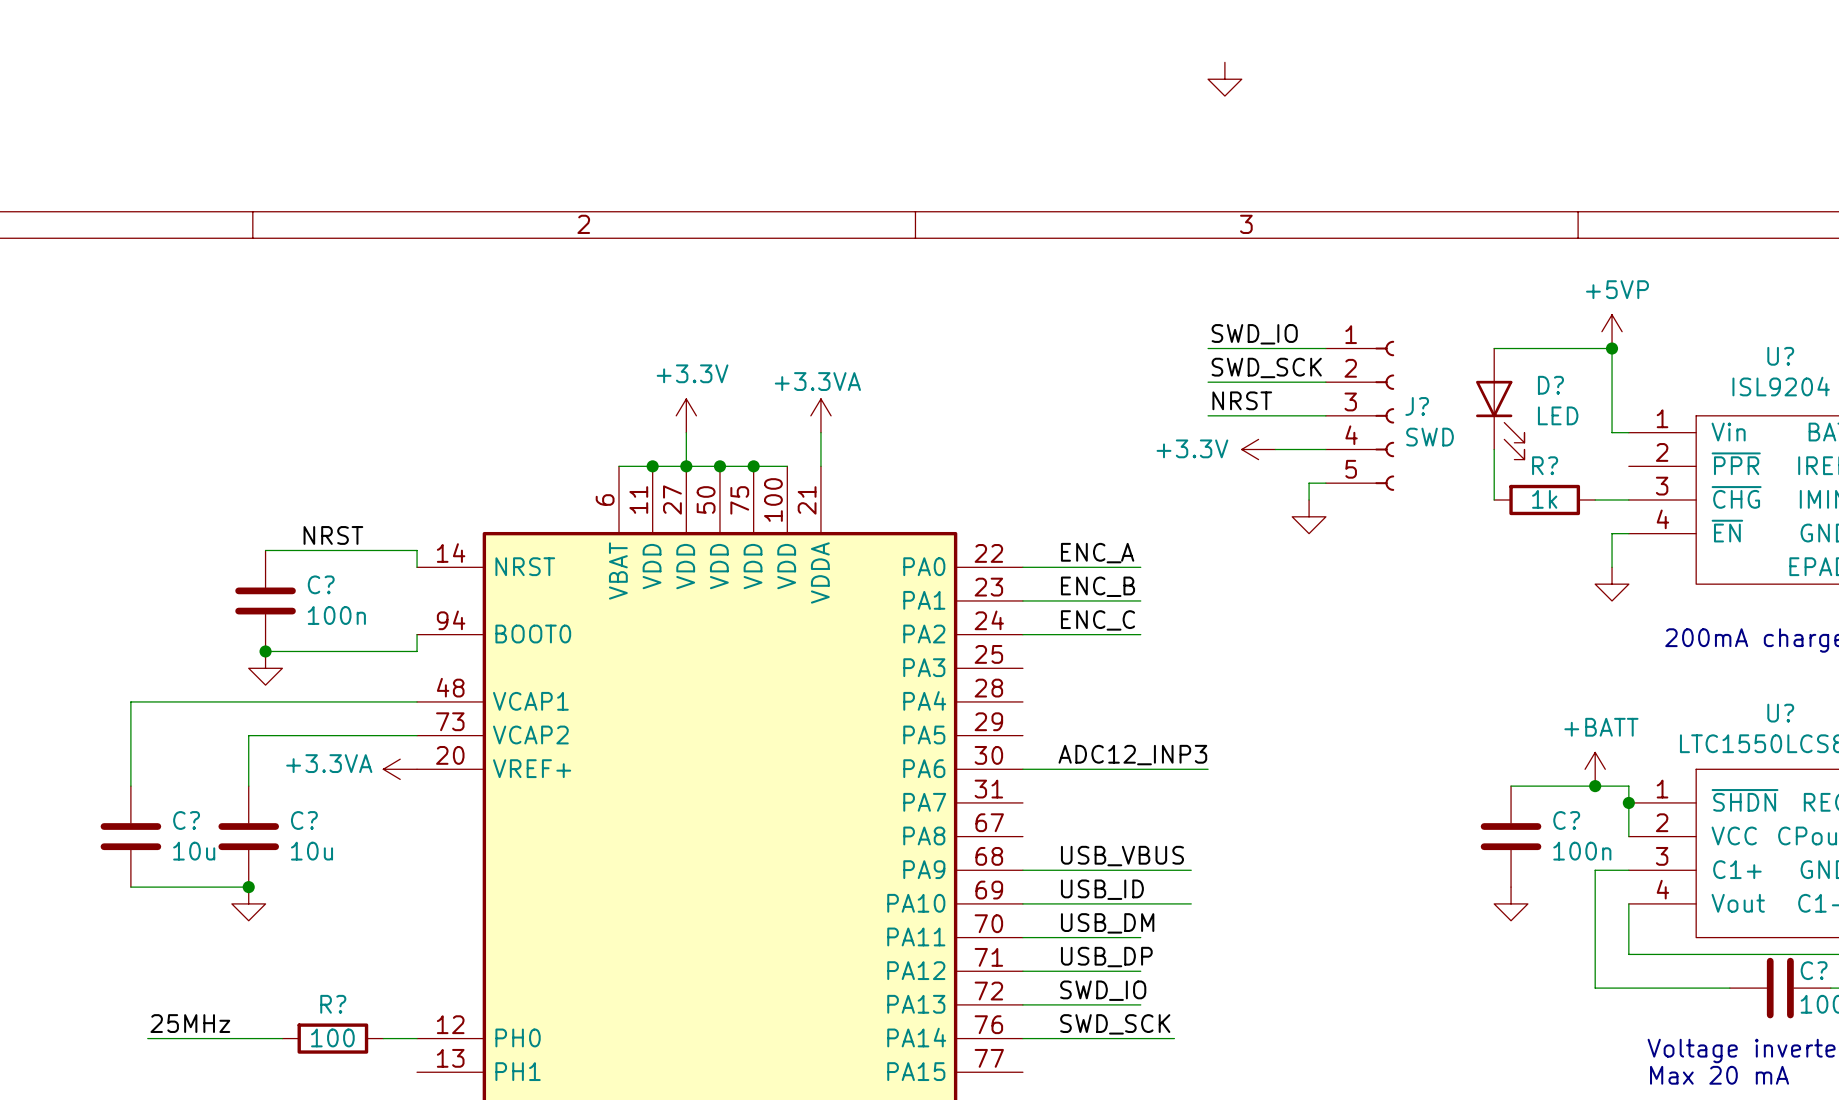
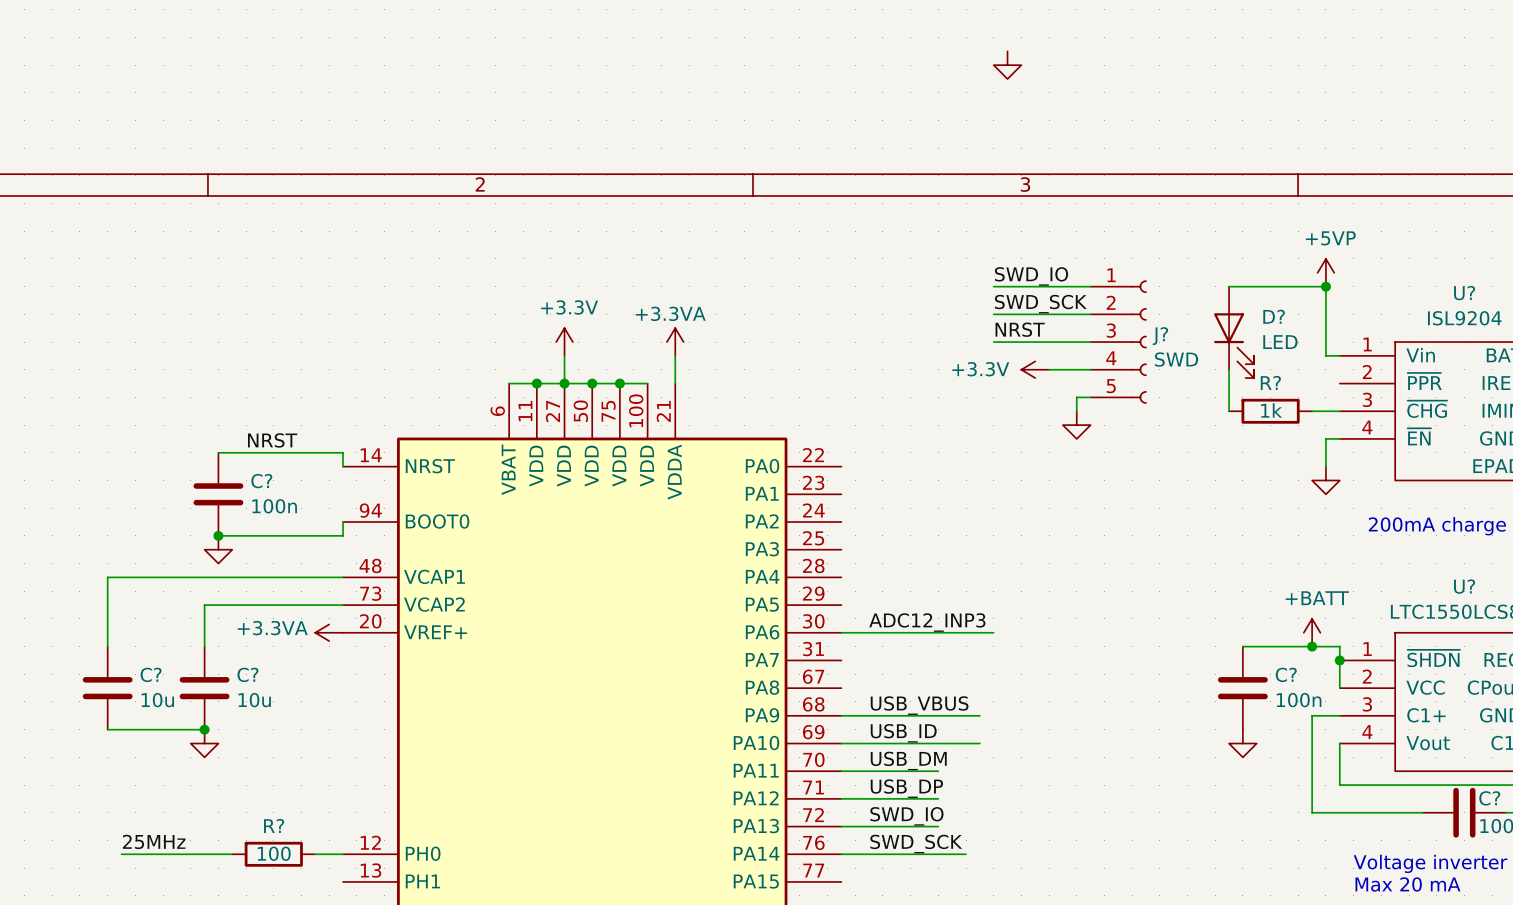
label: ENC_A (1097, 553) -> none
wire: (1022, 567) (1140, 567) -> none
label: ENC_B (1098, 586) -> none
wire: (1022, 600) (1140, 600) -> none
label: ENC_C (1098, 620) -> none
wire: (1022, 634) (1140, 634) -> none

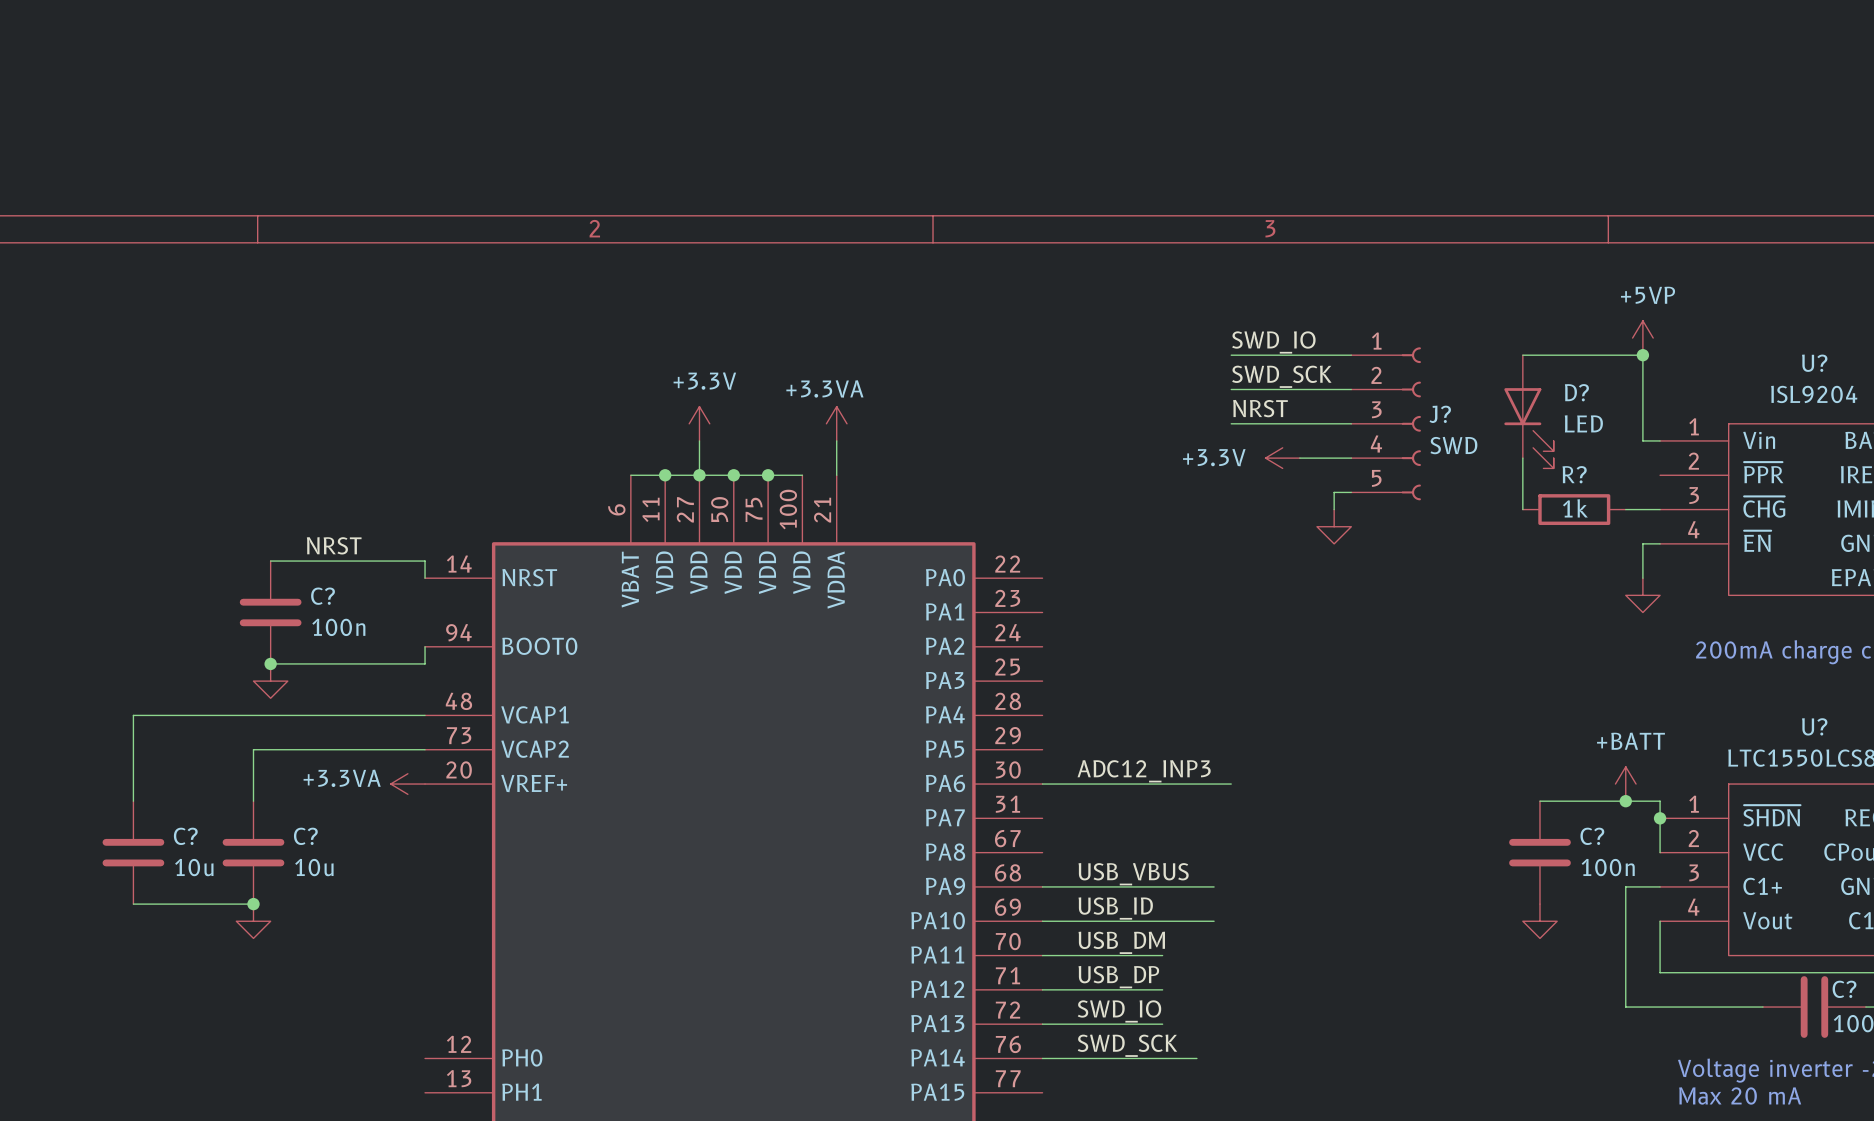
power symbol: (1007, 65) -> none
label: 25MHz (154, 841) -> none
wire: (121, 854) (232, 854) -> none
R?: 100 (273, 854) -> none
wire: (315, 854) (343, 854) -> none

